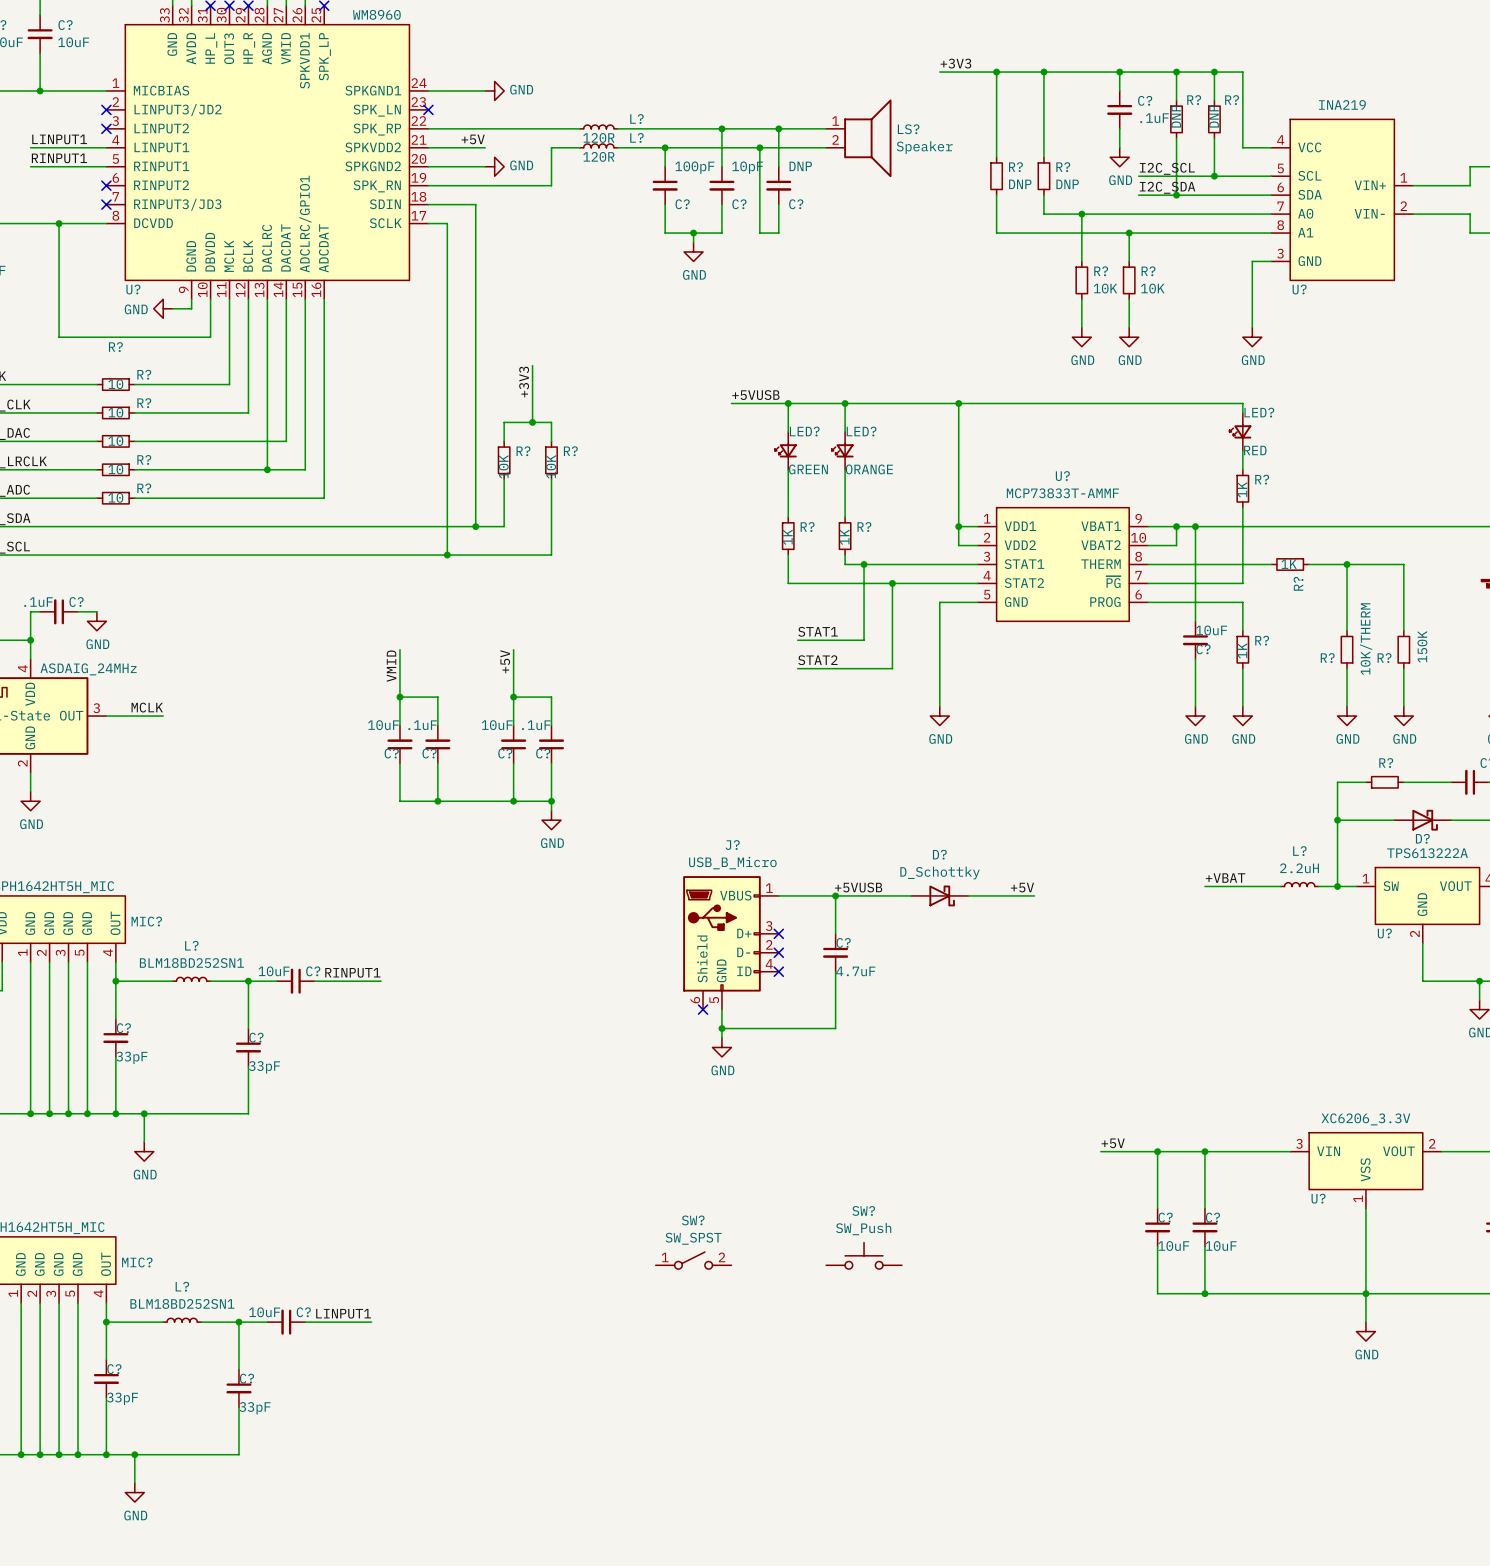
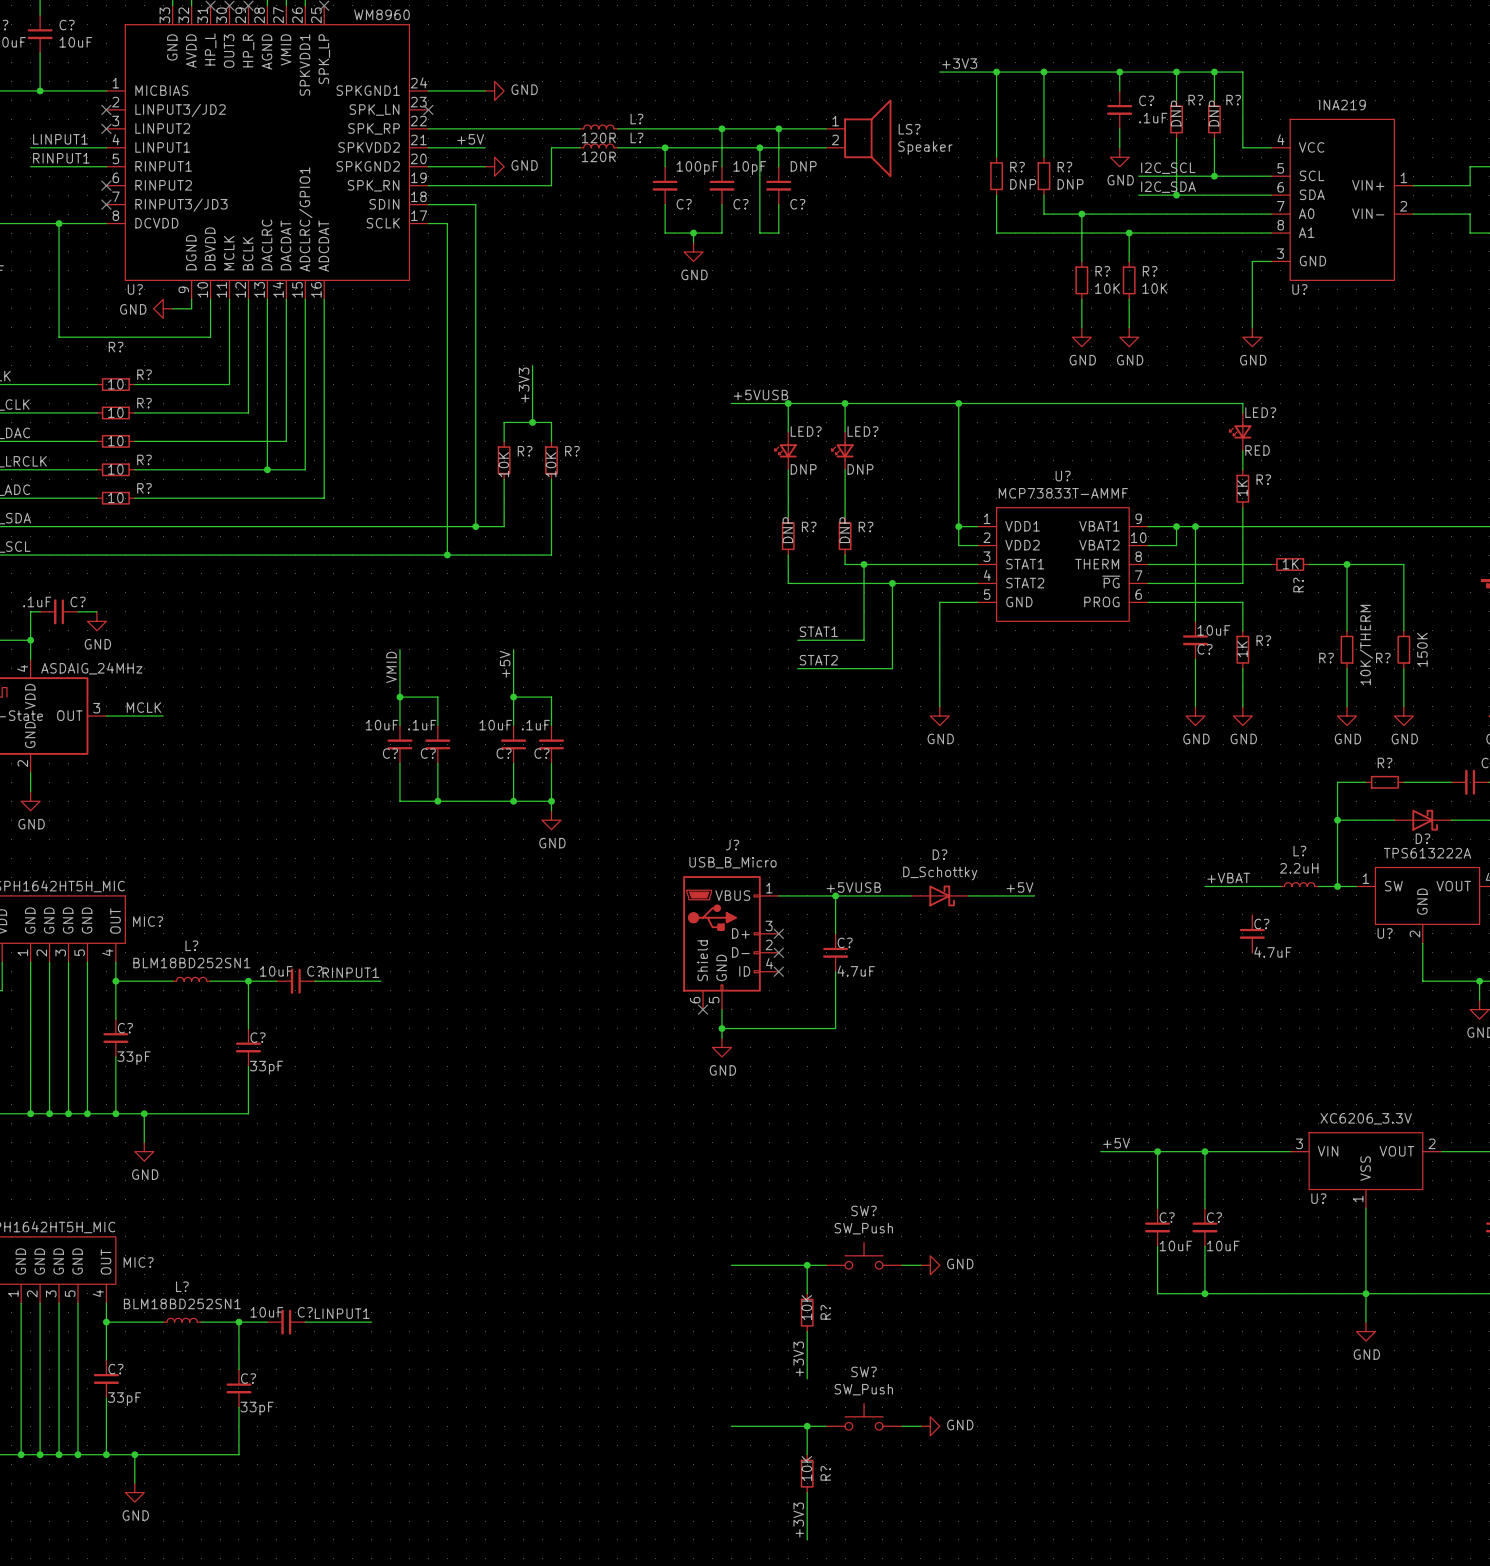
LED? value: GREEN (808, 469) -> DNP (803, 469)
LED? value: ORANGE (869, 469) -> DNP (860, 469)
R? value: 1K (787, 537) -> DNP (787, 530)
R? value: 1K (844, 537) -> DNP (844, 530)
C?: none -> 4.7uF (1252, 933)
SW?: SW_SPST (693, 1260) -> none
wire: none -> (731, 1265) (826, 1265)
wire: none -> (807, 1265) (807, 1293)
junction: none -> (807, 1265)
wire: none -> (901, 1265) (920, 1265)
power symbol: none -> GND (930, 1265)
R?: none -> 10K (807, 1312)
wire: none -> (807, 1331) (807, 1378)
label: none -> +3V3 (798, 1359)
SW?: none -> SW_Push (864, 1416)
wire: none -> (731, 1426) (826, 1426)
wire: none -> (807, 1426) (807, 1454)
junction: none -> (807, 1426)
wire: none -> (901, 1426) (920, 1426)
power symbol: none -> GND (930, 1426)
R?: none -> 10K (807, 1473)
wire: none -> (807, 1492) (807, 1539)
label: none -> +3V3 (798, 1520)

